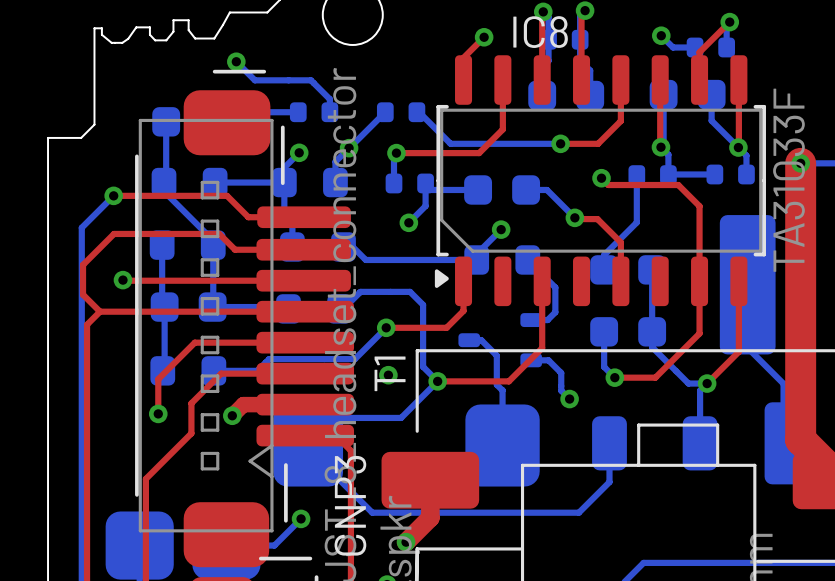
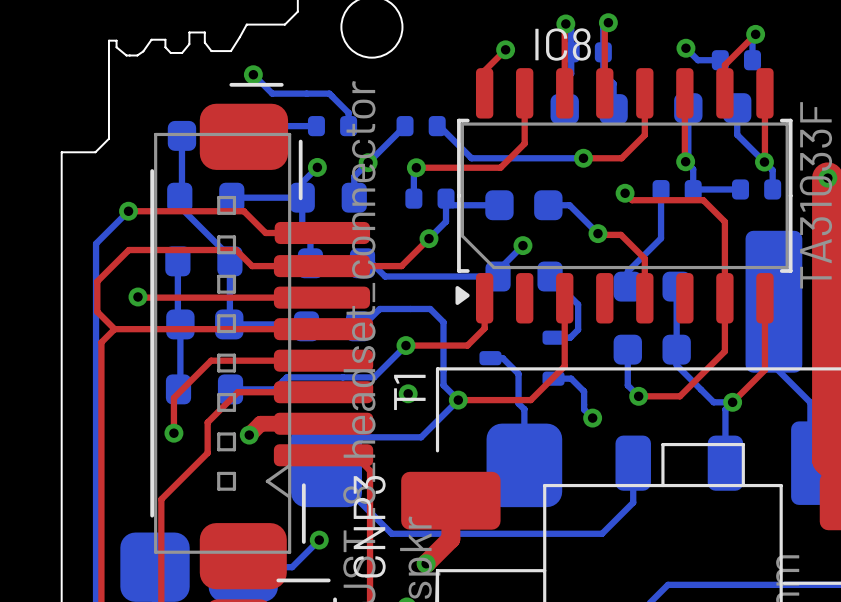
top track: none -> (429, 238) (401, 266) (321, 266)

